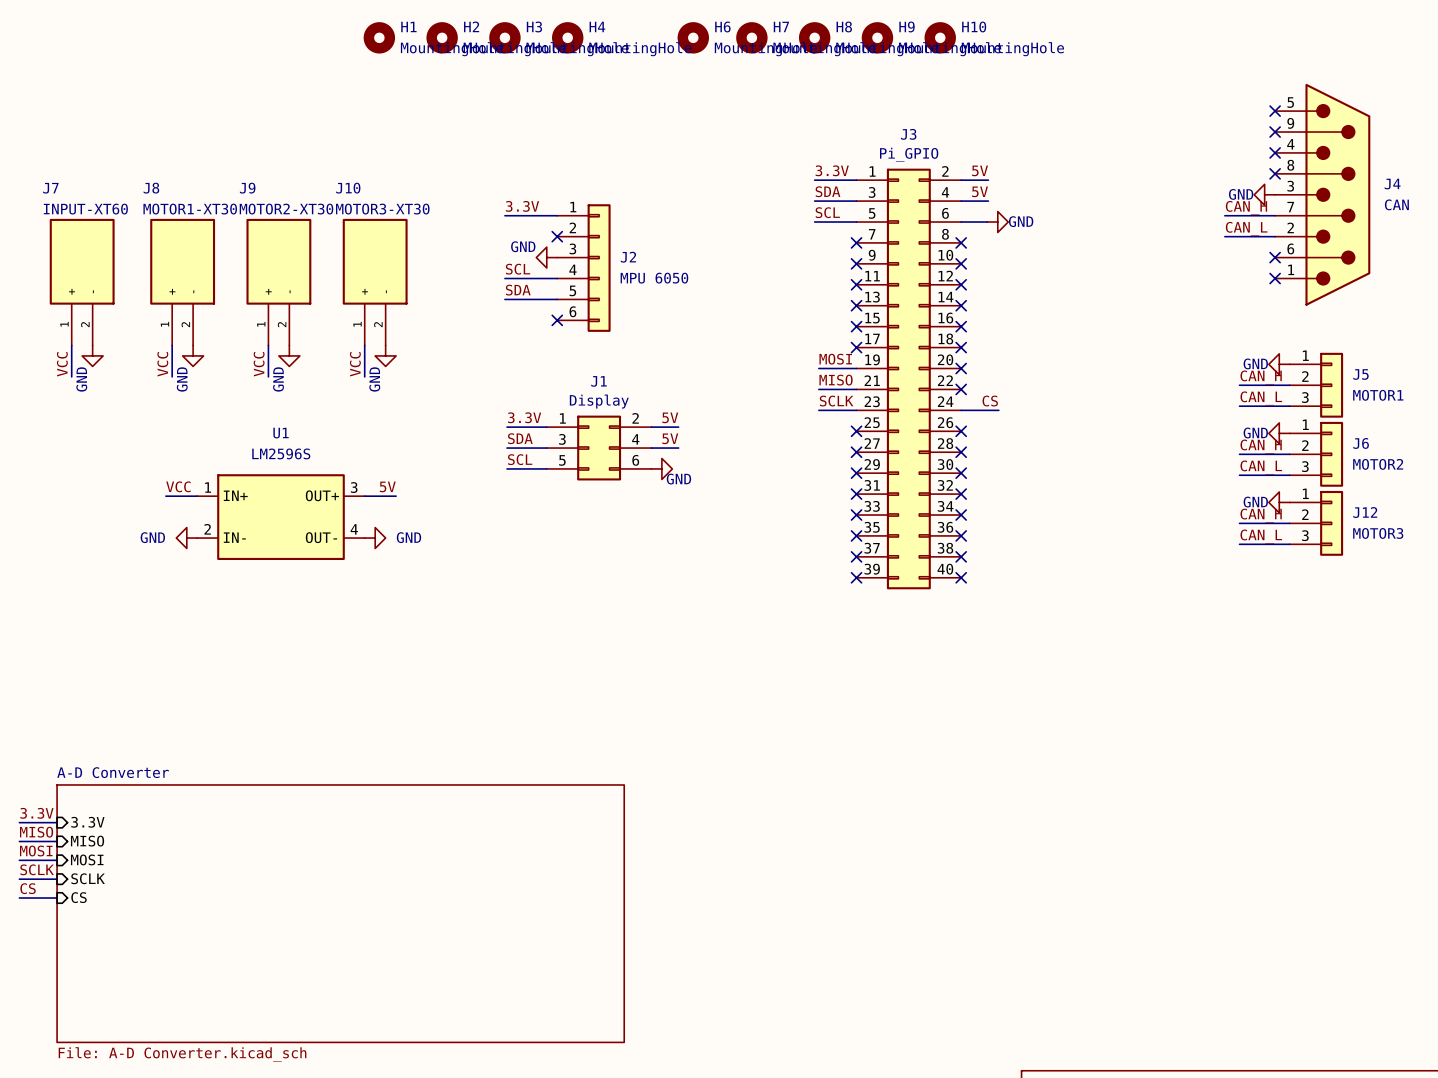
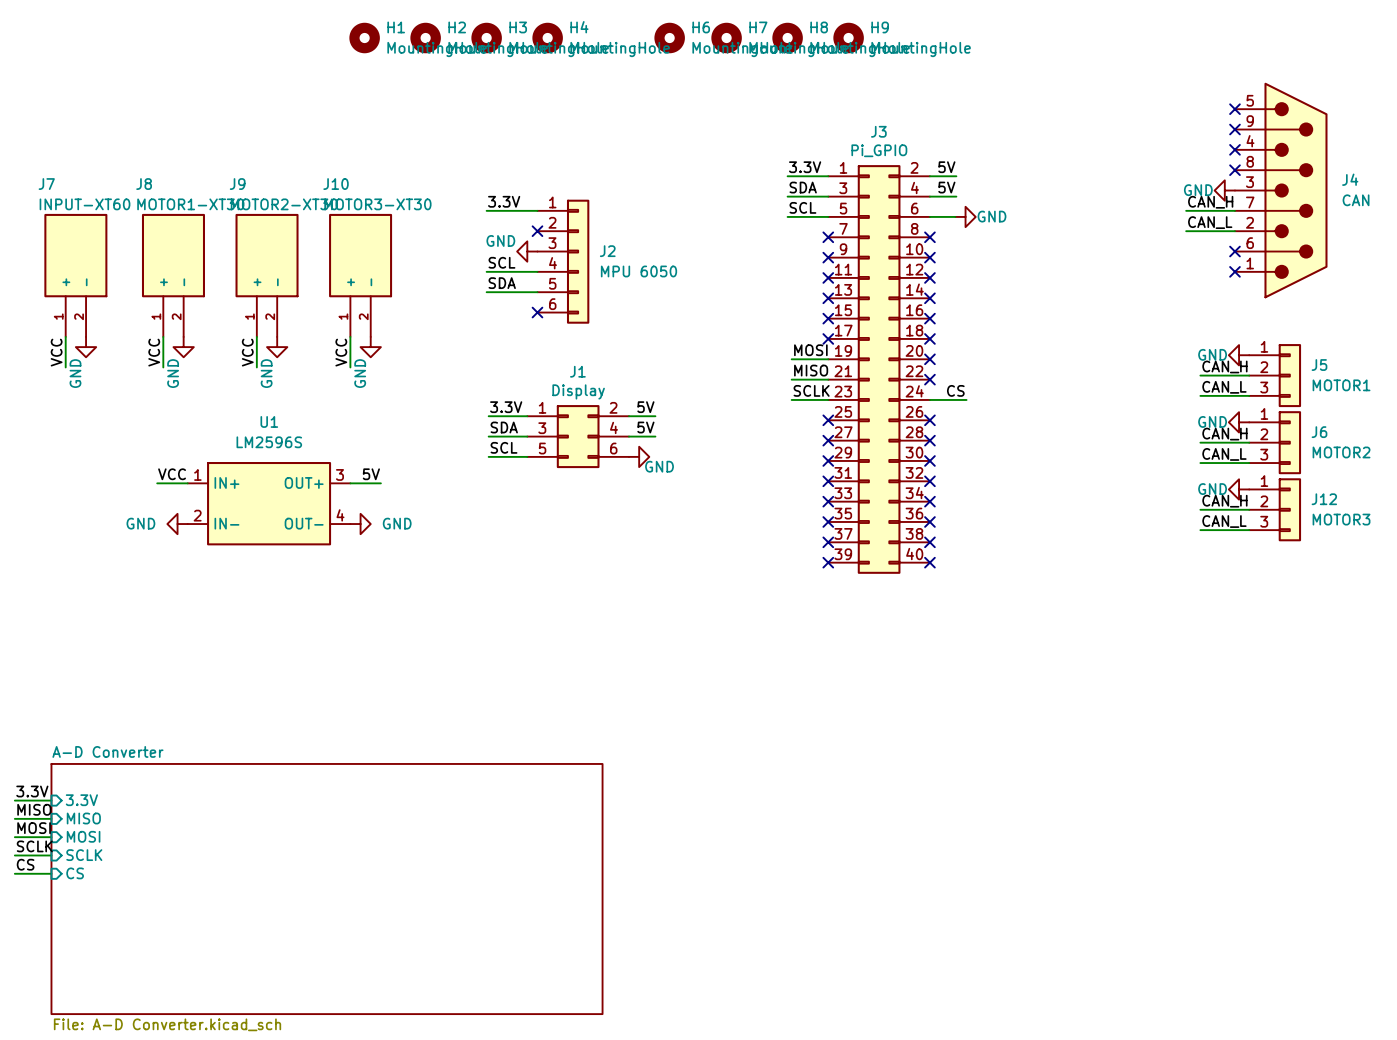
H10: MountingHole (940, 37) -> none

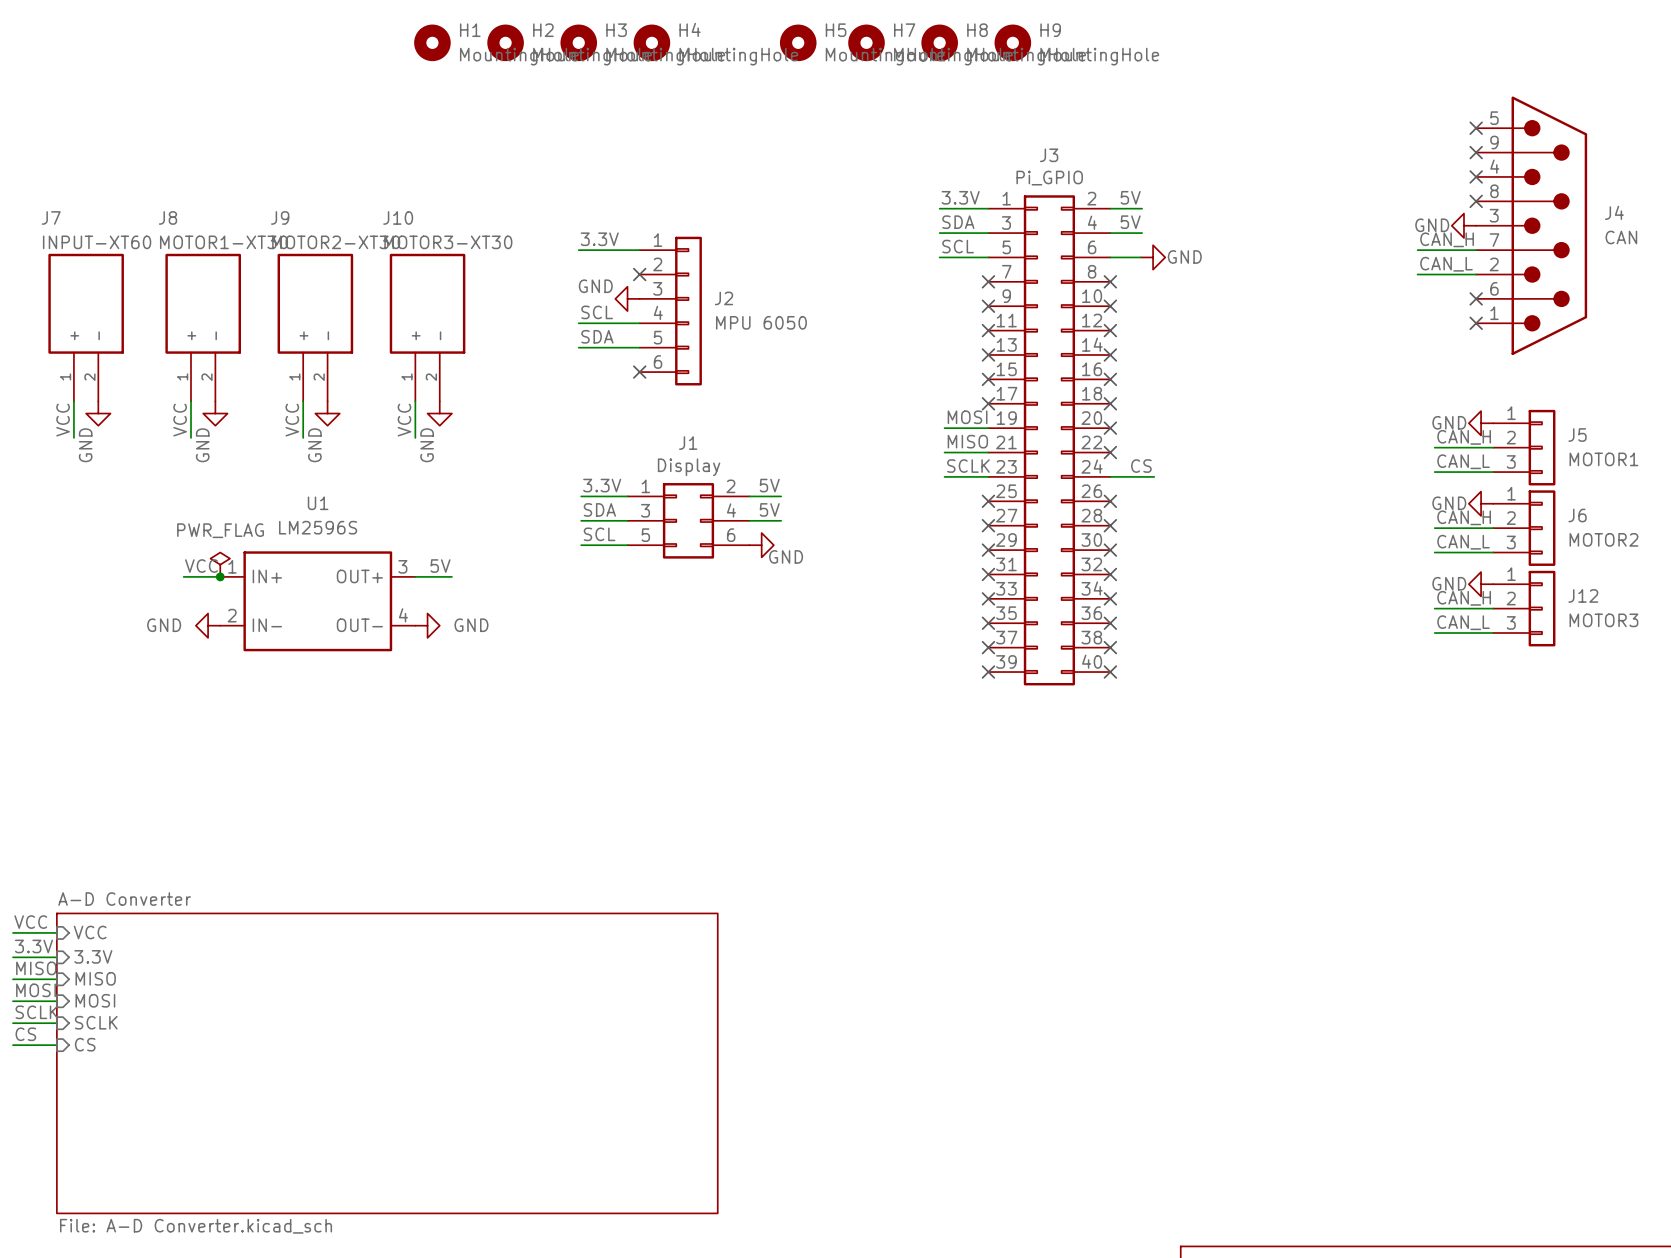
H6 name: H6 (701, 27) -> H5 (836, 30)
power symbol: none -> PWR_FLAG (220, 564)
junction: none -> (220, 576)
label: none -> VCC (30, 922)
sheet pin: none -> VCC (90, 932)
wire: none -> (12, 932) (56, 932)

